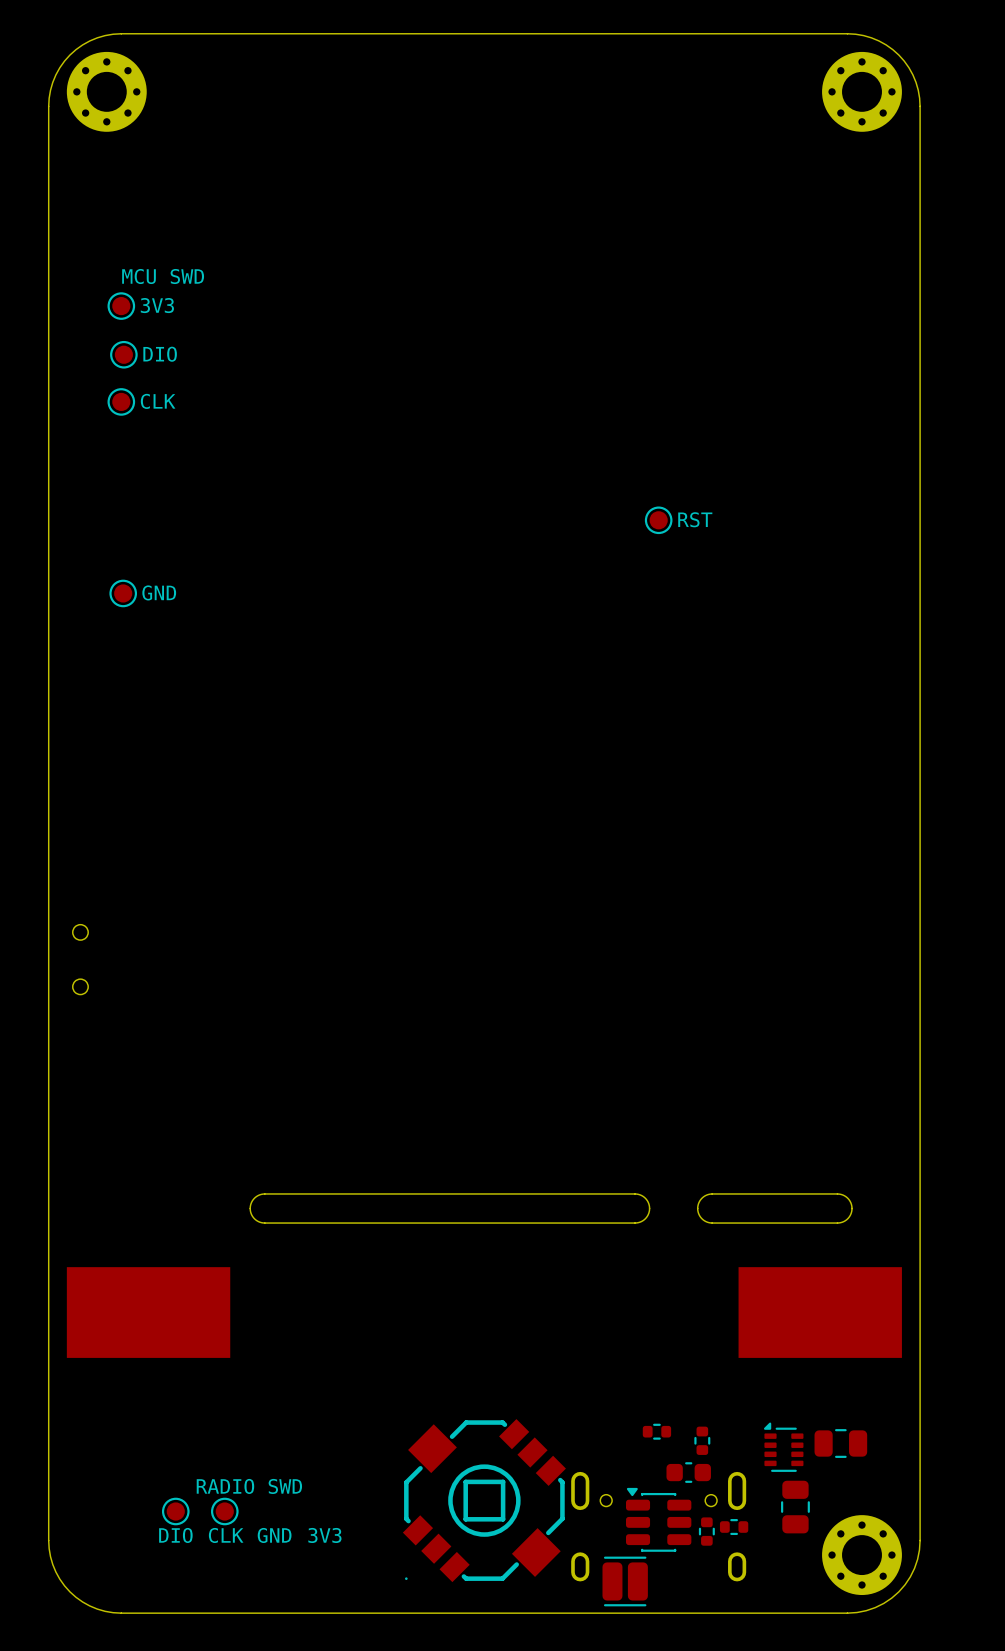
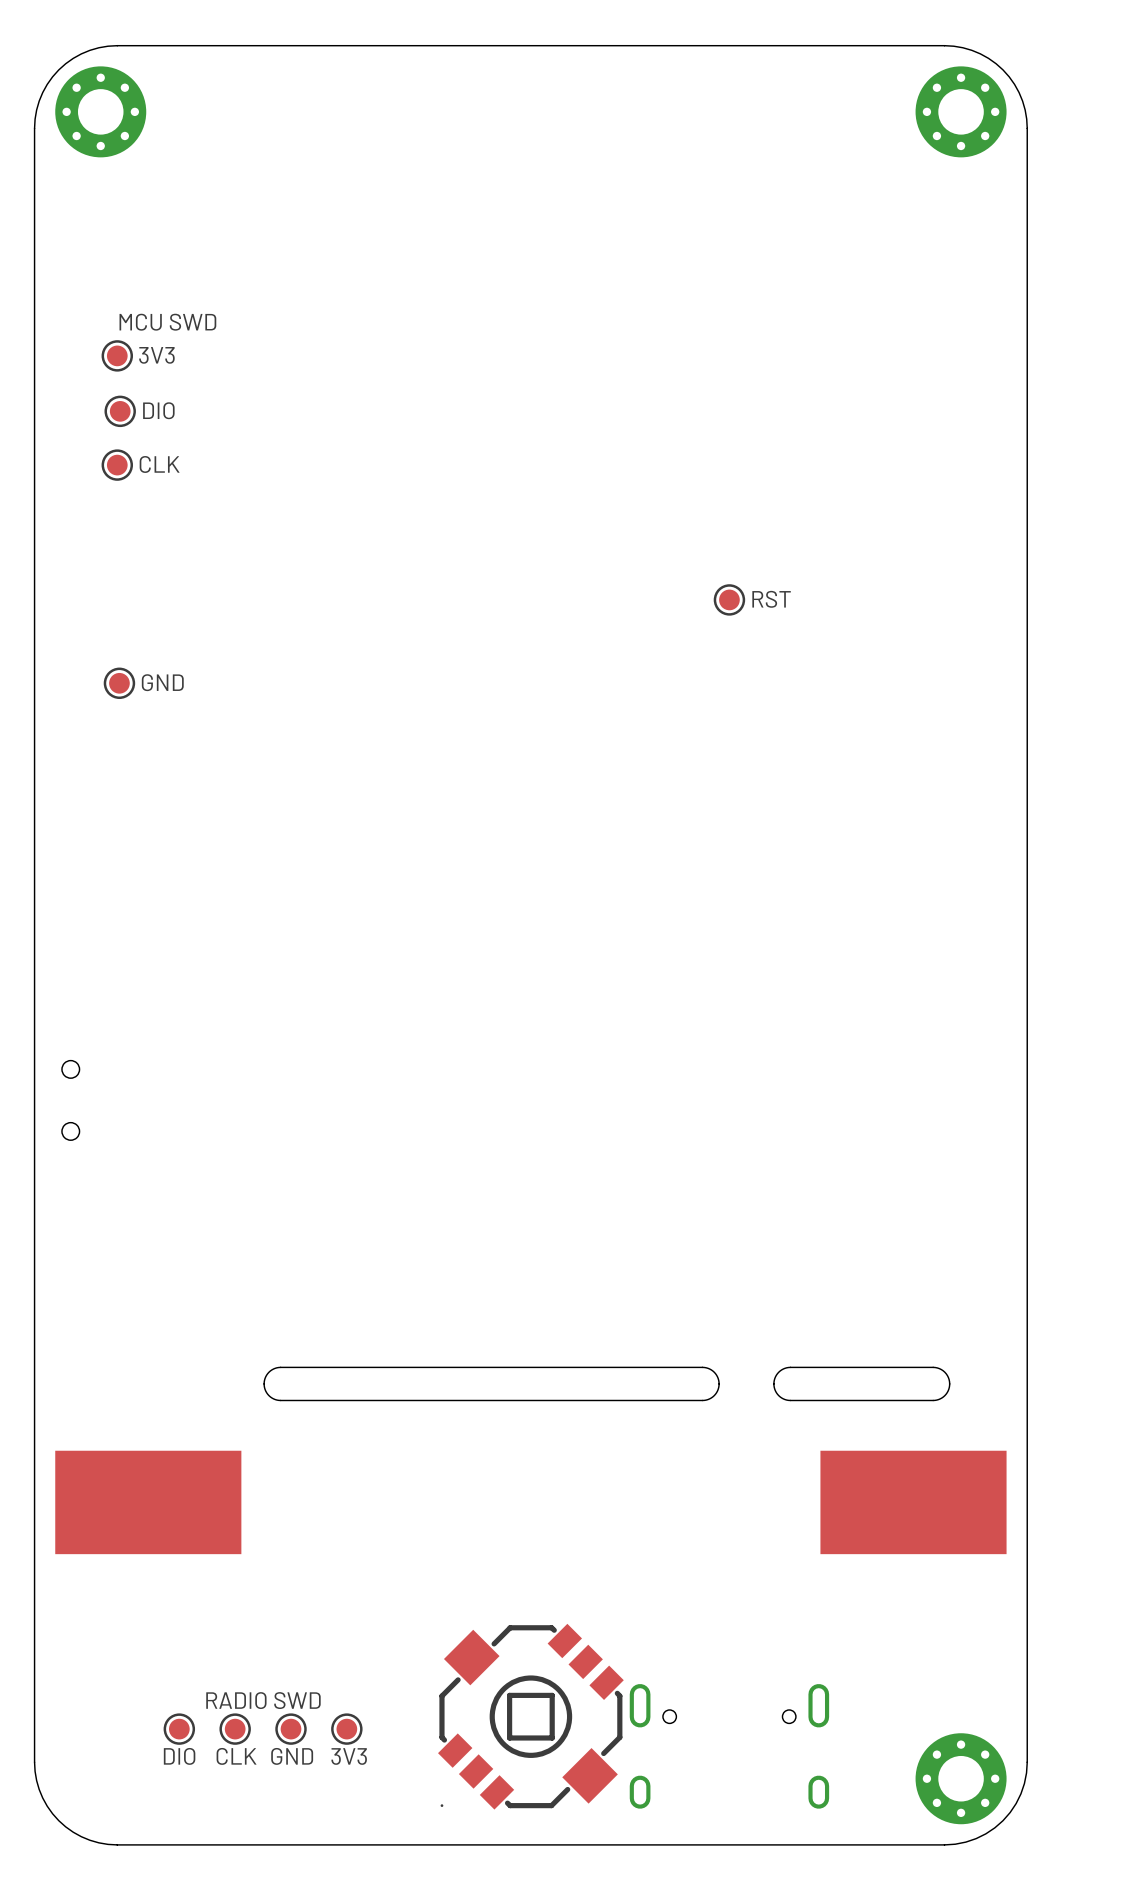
part: (656, 1431) -> none
part: (702, 1440) -> none
part: (840, 1443) -> none
part: (783, 1447) -> none
part: (688, 1472) -> none
part: (795, 1507) -> none
part: none -> (291, 1729)
part: none -> (346, 1729)
part: (658, 1519) -> none
part: (734, 1527) -> none
part: (706, 1531) -> none
part: (625, 1581) -> none

